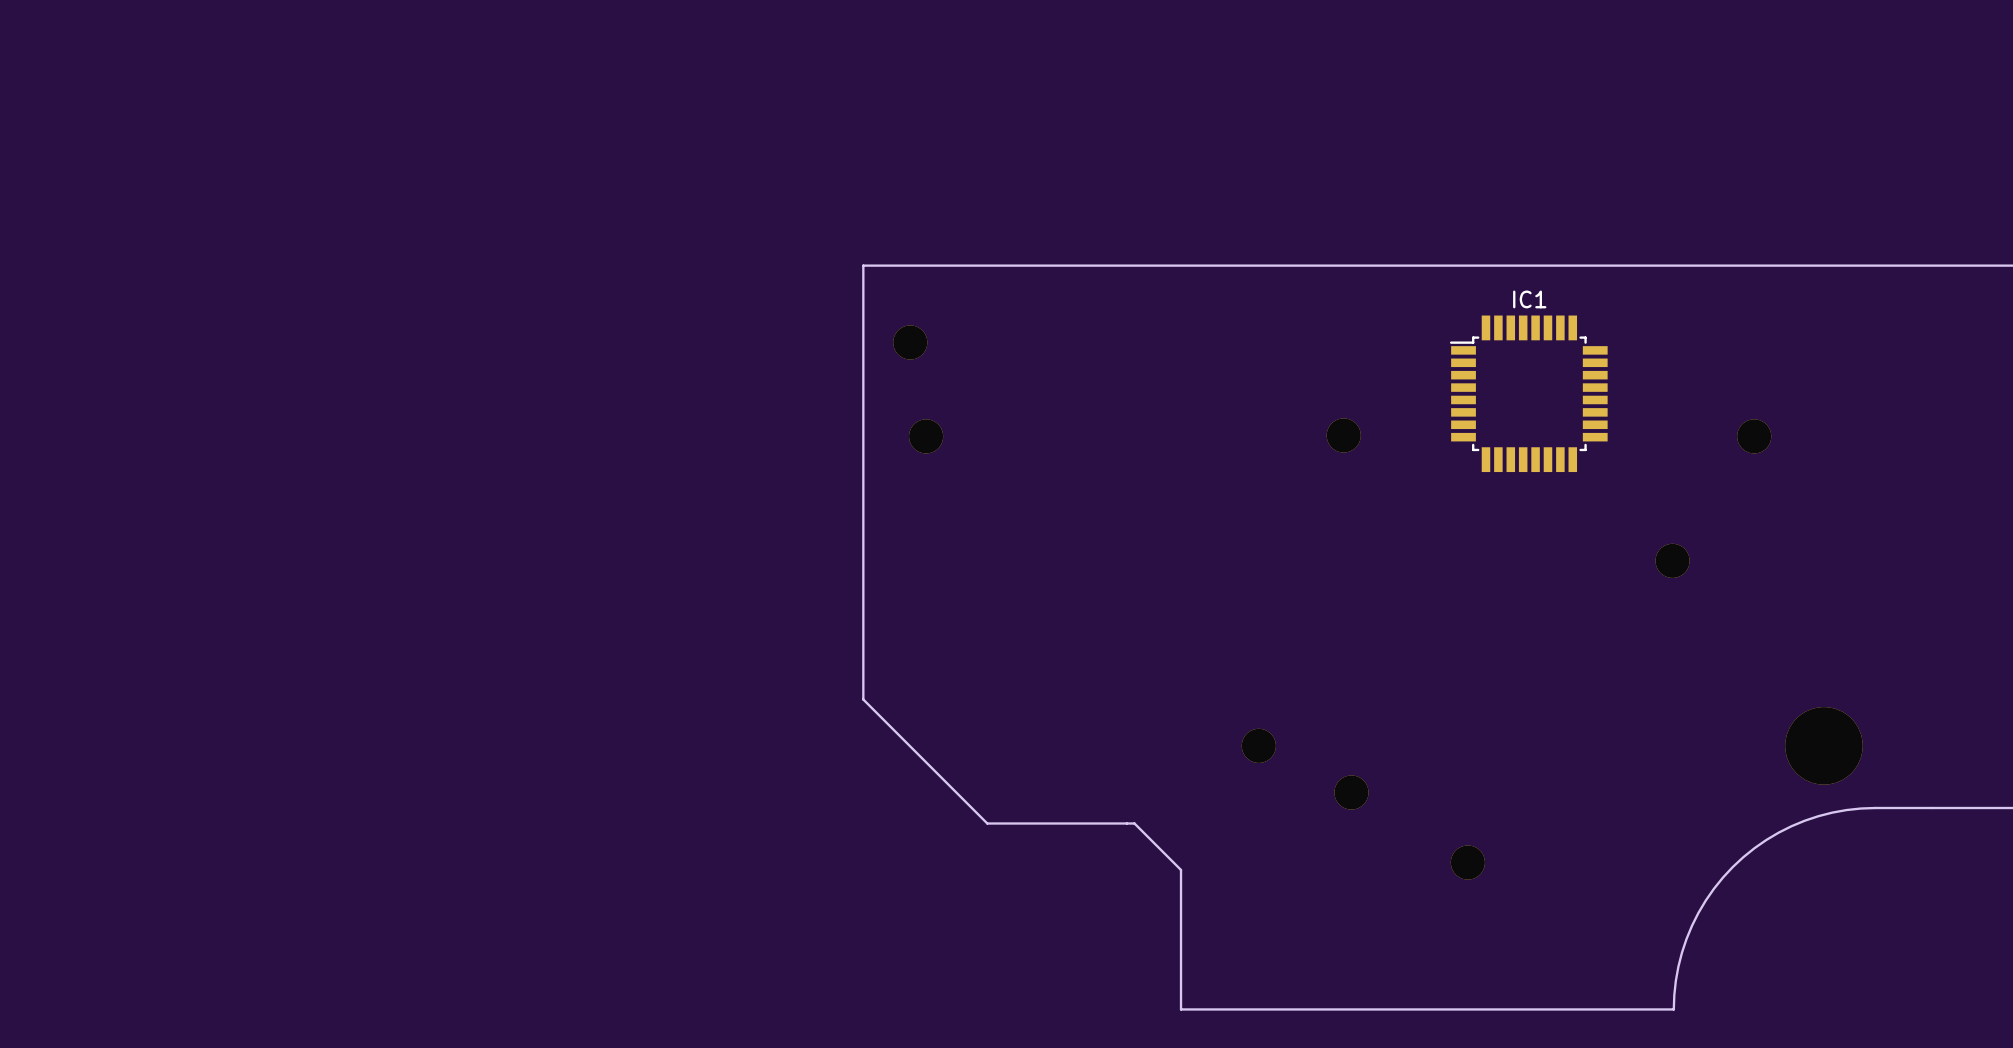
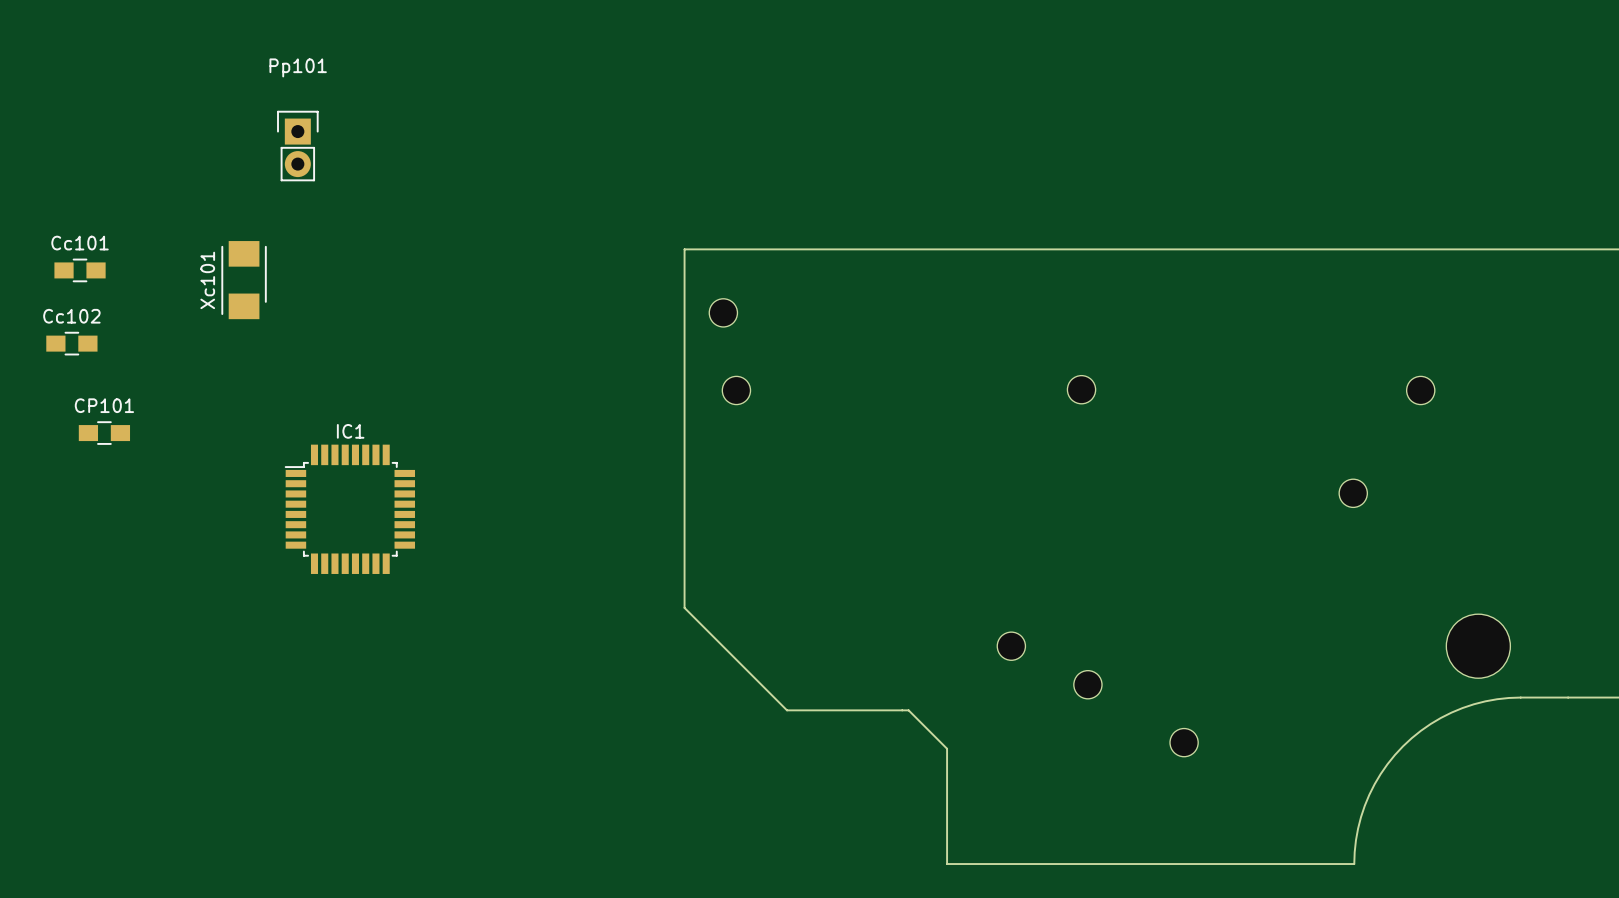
Pp101: none -> (297, 146)
Cc101: none -> (80, 270)
Xc101: none -> (244, 280)
part footprint: [893, 325, 928, 360] -> [709, 298, 738, 327]
Cc102: none -> (71, 343)
IC1 position: (1528, 393) -> (349, 509)
part footprint: [1326, 418, 1361, 453] -> [1067, 375, 1096, 404]
part footprint: [909, 419, 944, 454] -> [722, 376, 751, 405]
part footprint: [1737, 419, 1772, 454] -> [1406, 376, 1435, 405]
CP101: none -> (104, 433)
part footprint: [1655, 543, 1690, 578] -> [1339, 479, 1368, 508]
part footprint: [1785, 707, 1863, 785] -> [1446, 614, 1511, 679]
part footprint: [1241, 728, 1276, 763] -> [997, 632, 1026, 661]
part footprint: [1334, 775, 1369, 810] -> [1073, 670, 1103, 699]
part footprint: [1450, 845, 1485, 880] -> [1170, 728, 1199, 757]

